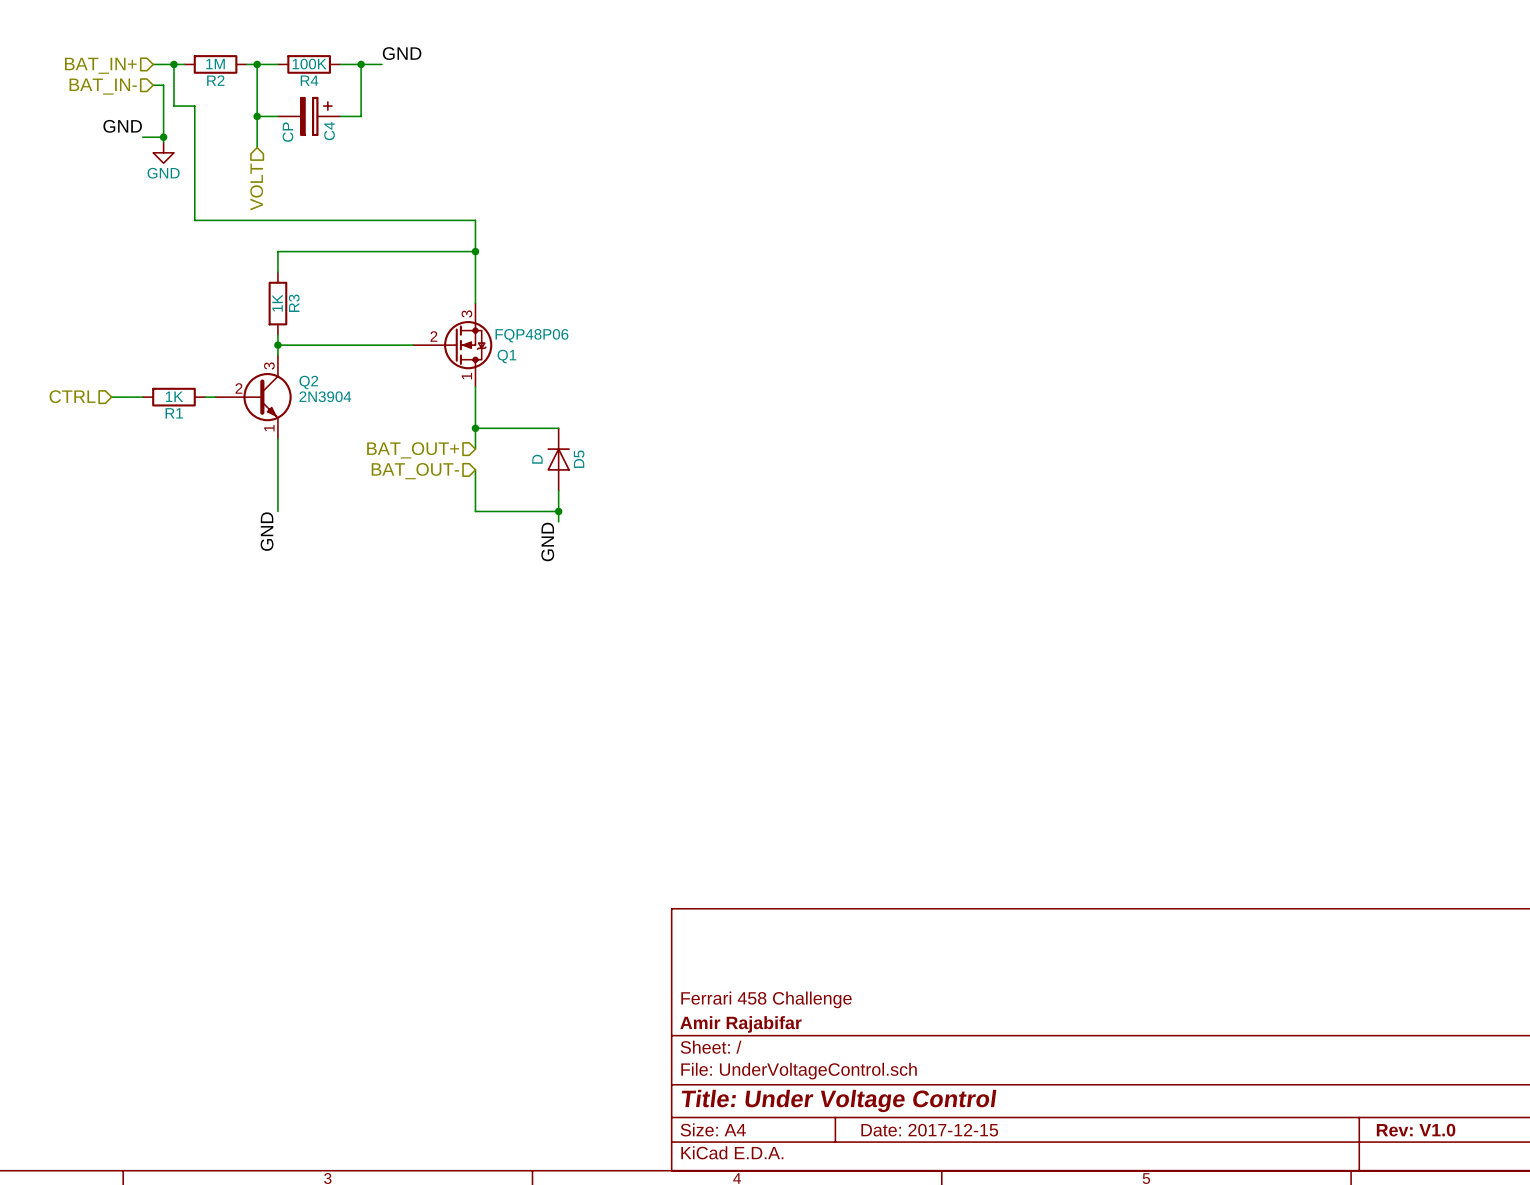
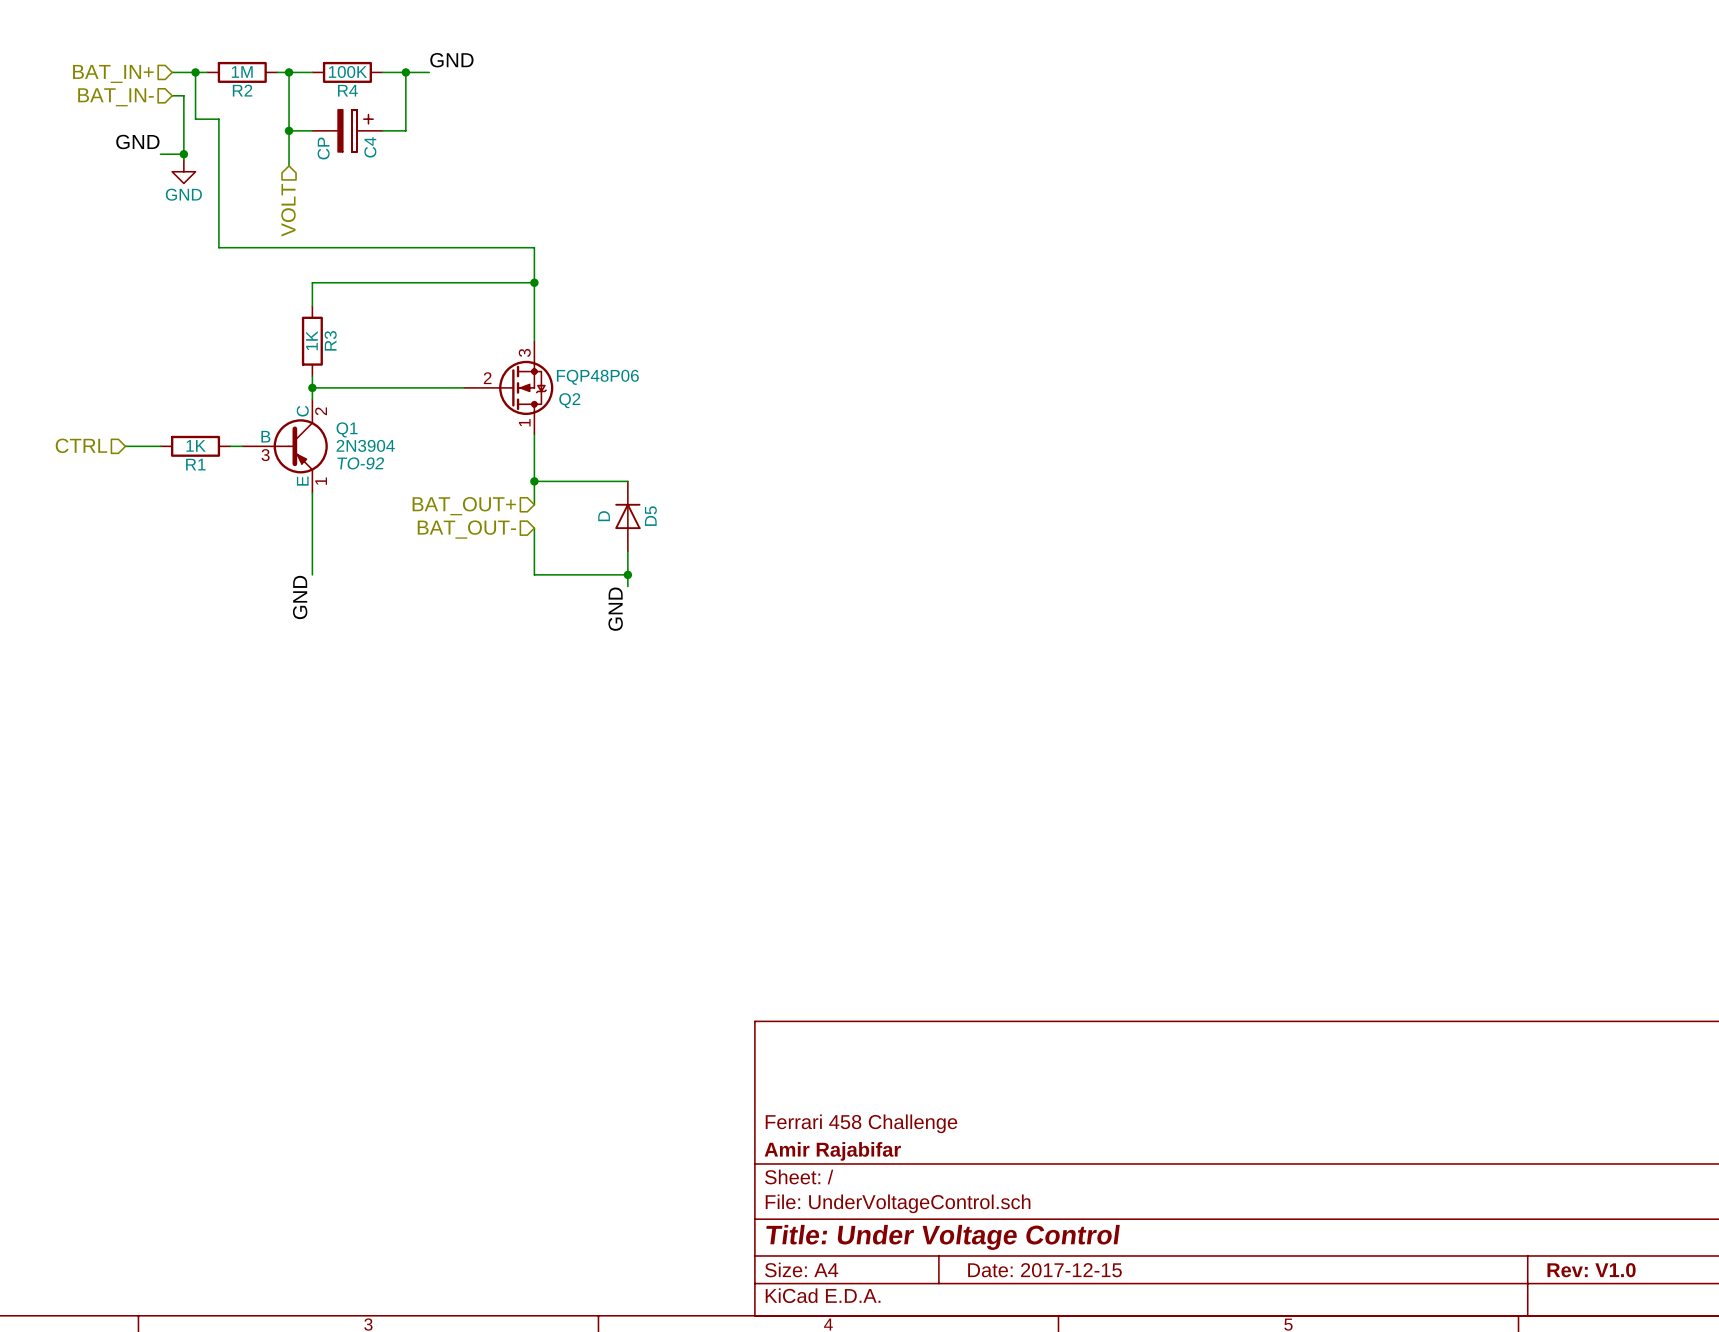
Q1 name: Q1 (506, 356) -> Q2 (569, 400)
Q2: 2N3904 (253, 397) -> none
Q1: none -> 2N3904 (285, 446)

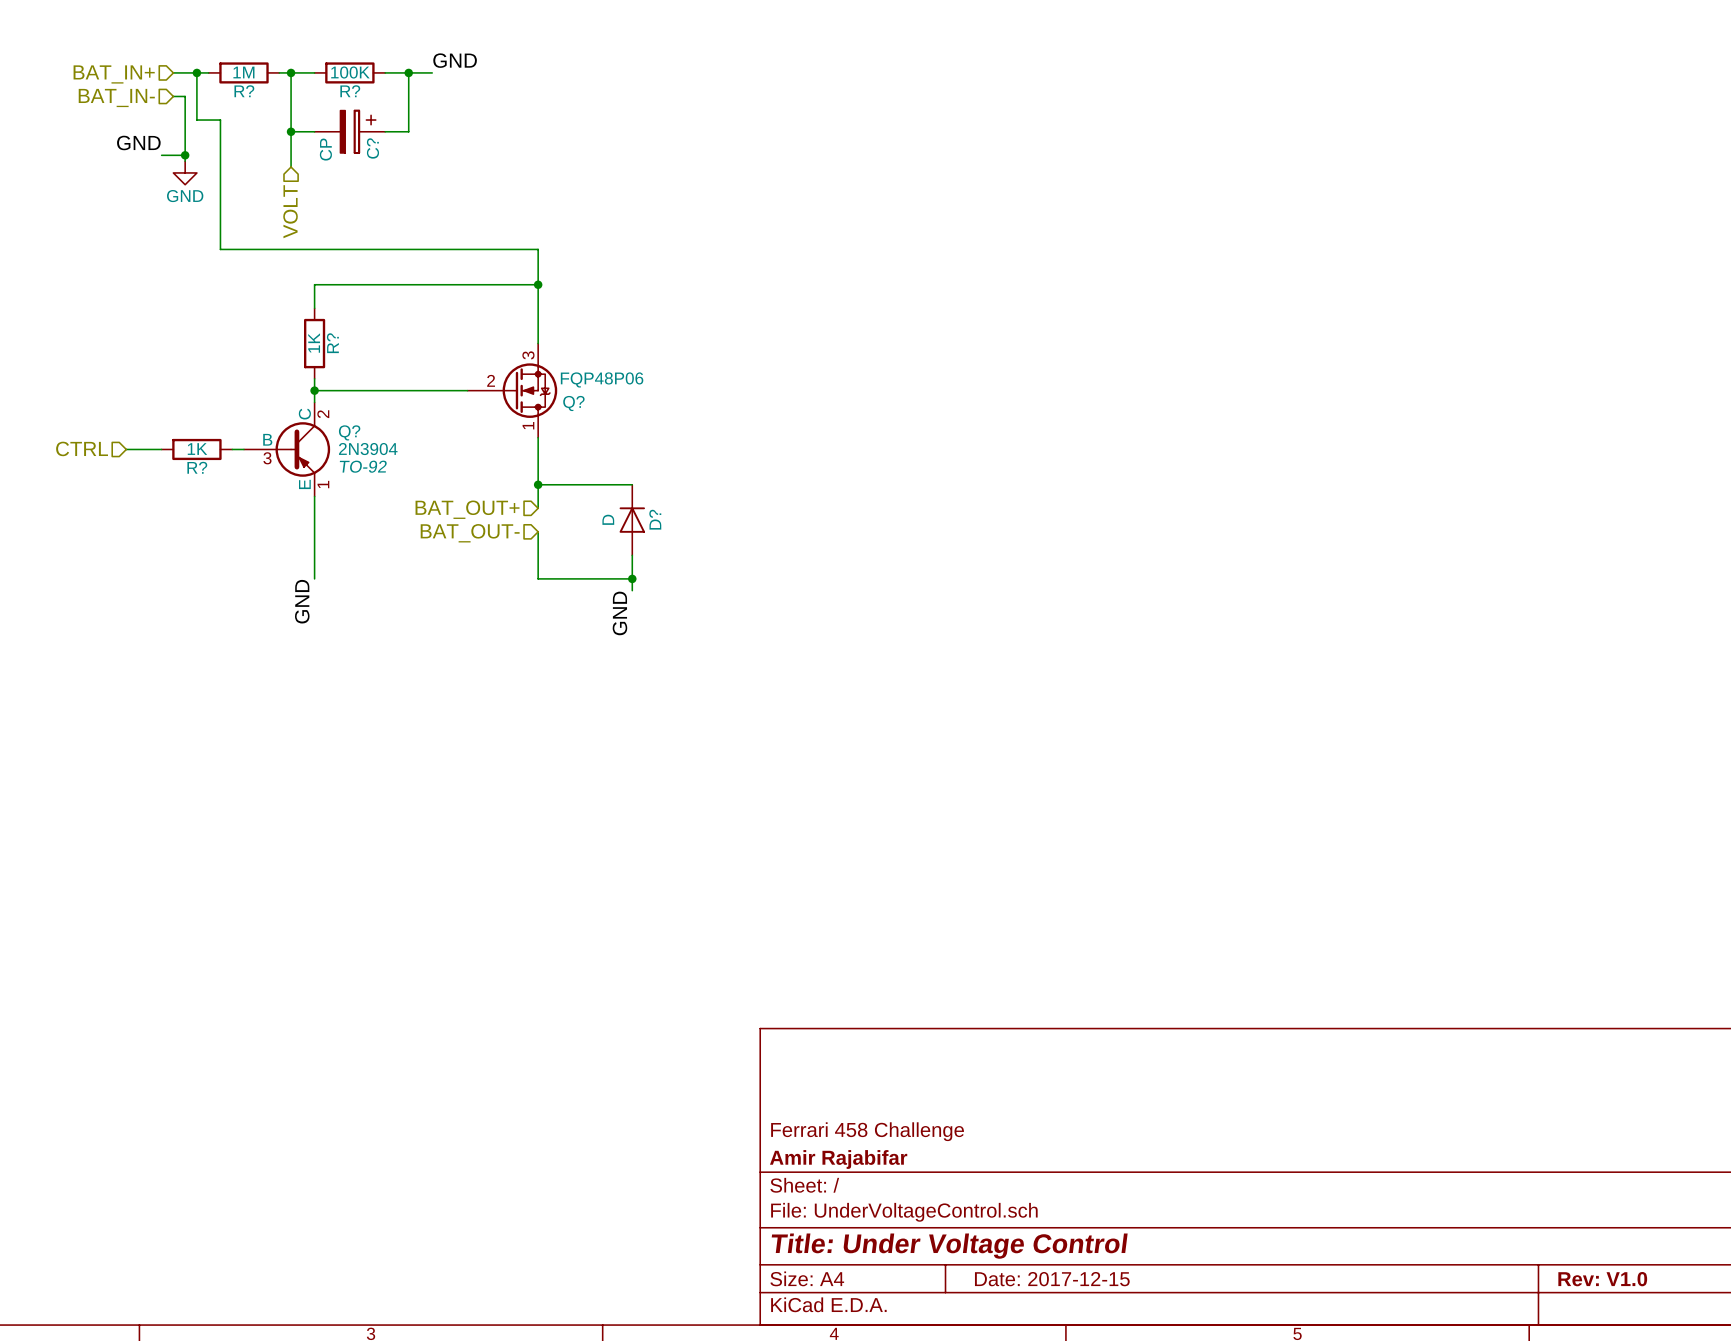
R2 name: R2 (242, 90) -> R? (244, 91)
R4 name: R4 (347, 90) -> R? (350, 91)
C4 name: C4 (370, 147) -> C? (372, 148)
R3 name: R3 (330, 340) -> R? (332, 343)
Q2 name: Q2 (569, 400) -> Q? (573, 403)
Q1 name: Q1 (347, 429) -> Q? (349, 432)
R1 name: R1 (195, 464) -> R? (197, 467)
D5 name: D5 (650, 516) -> D? (655, 519)

